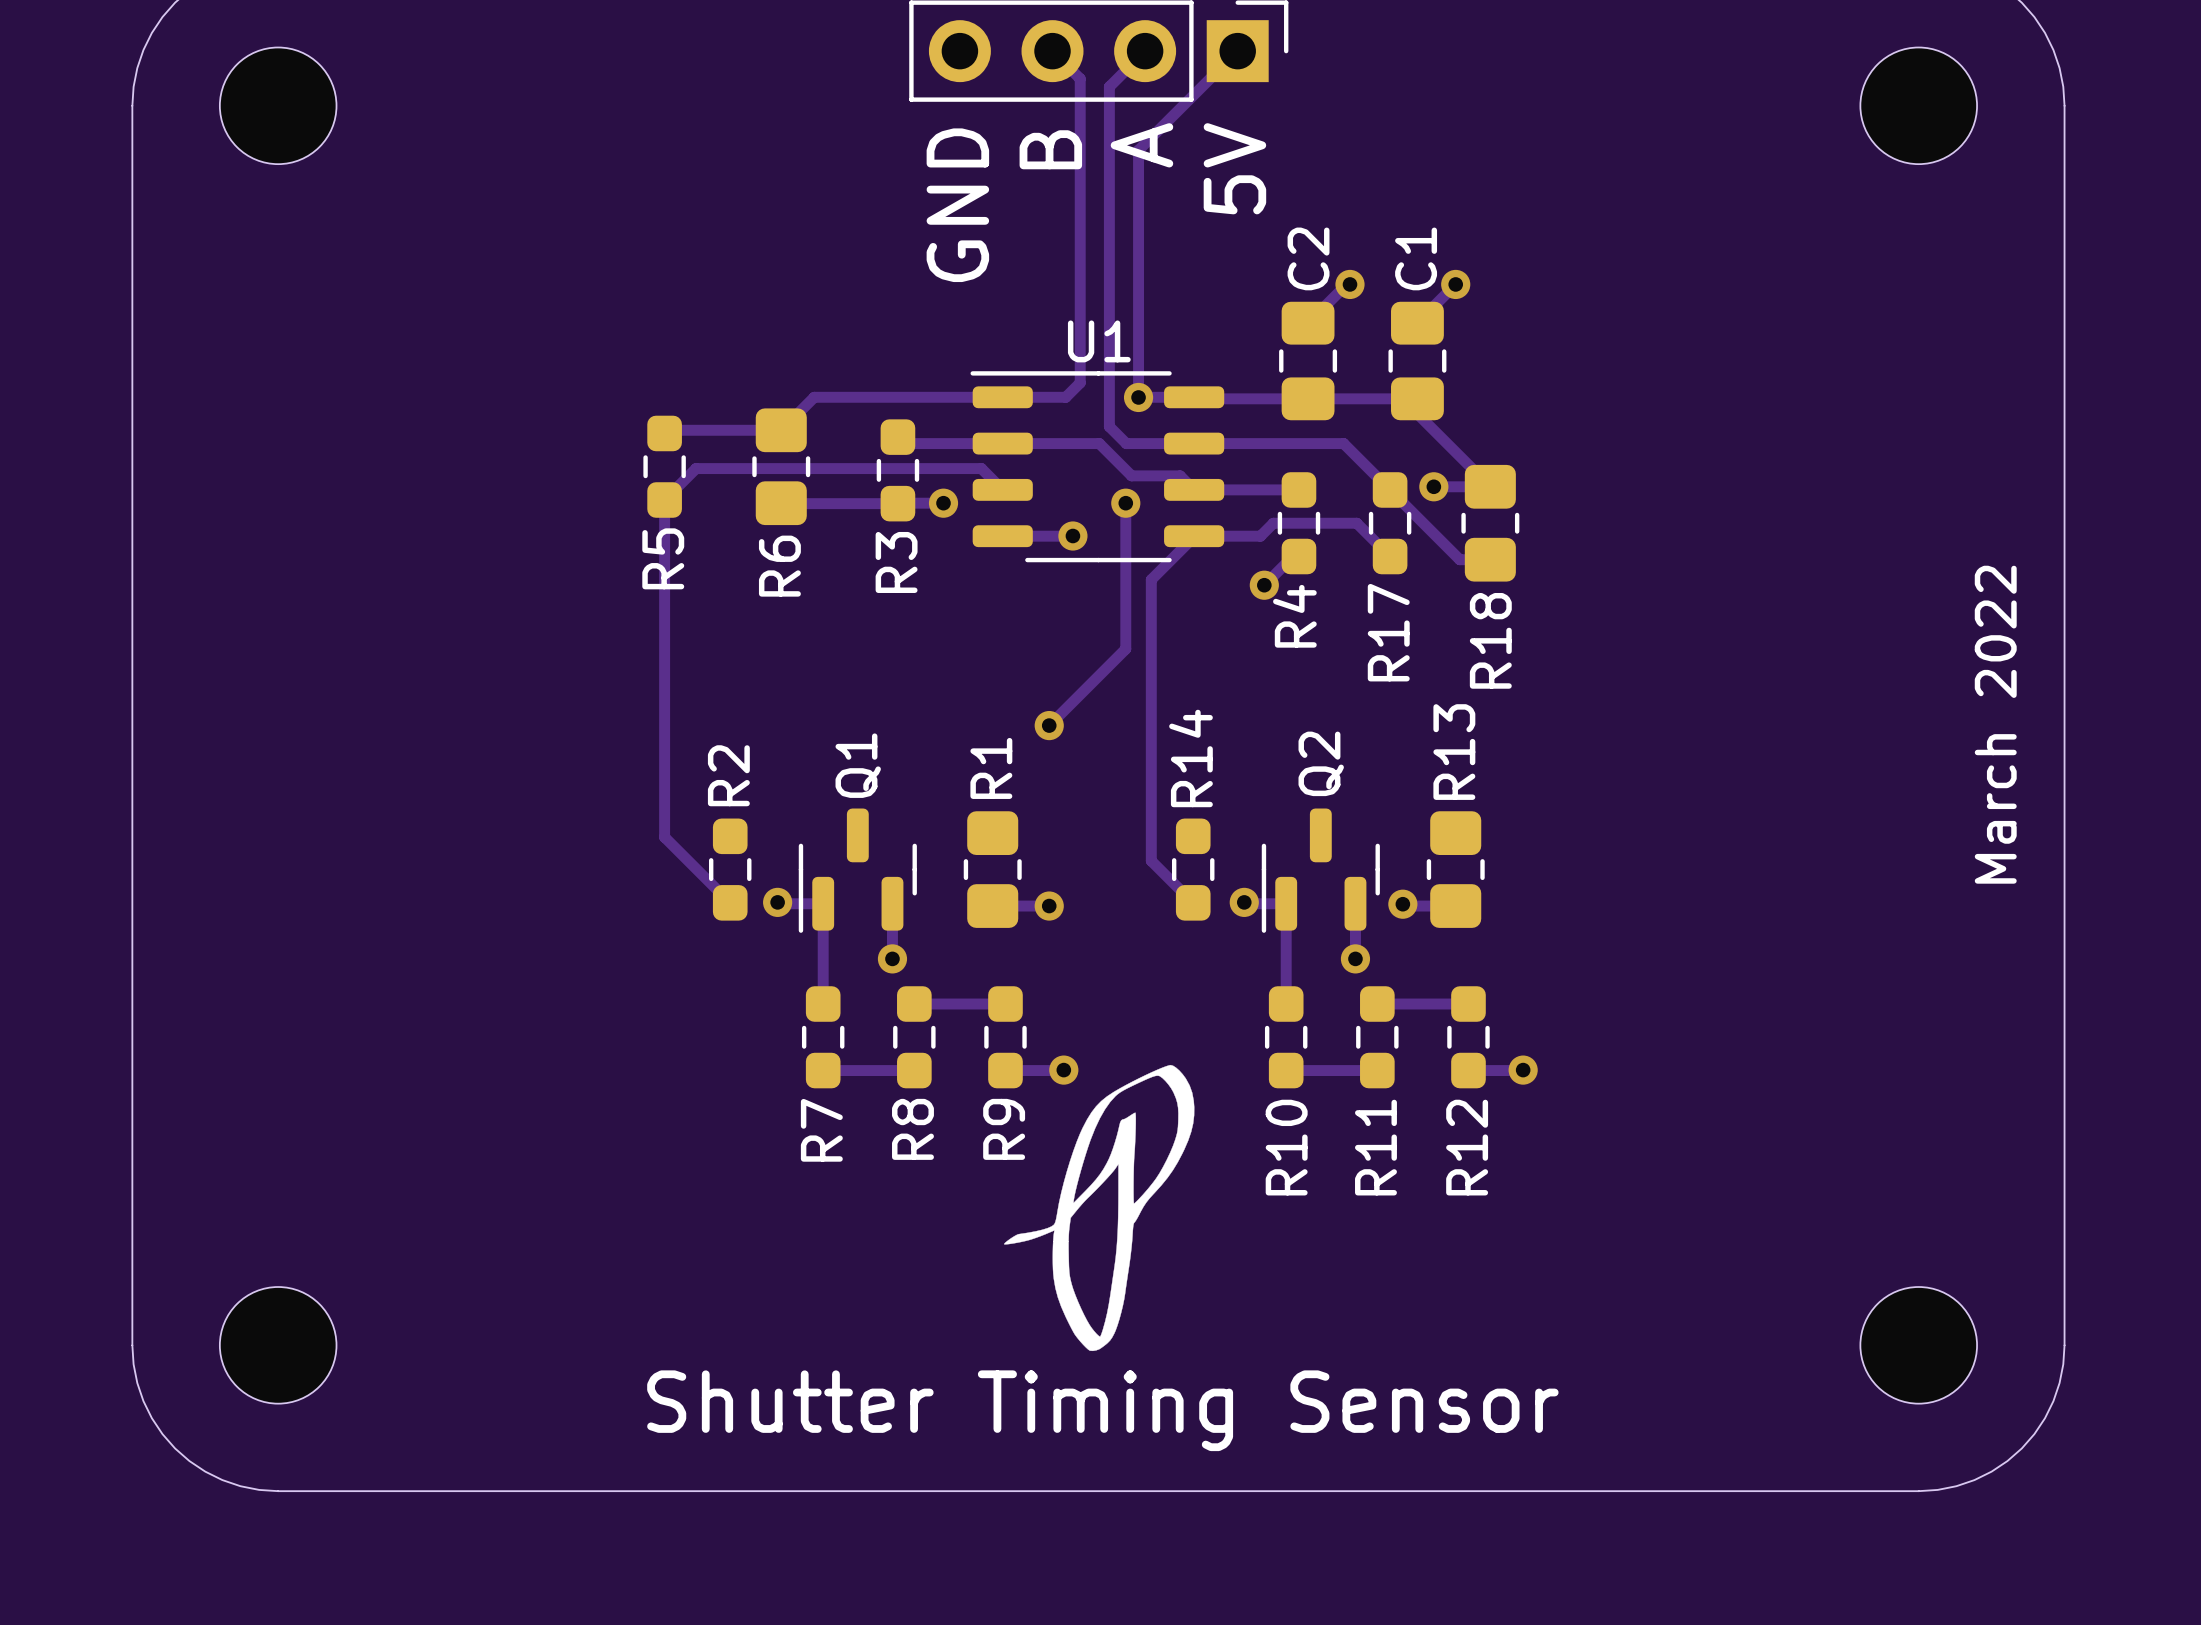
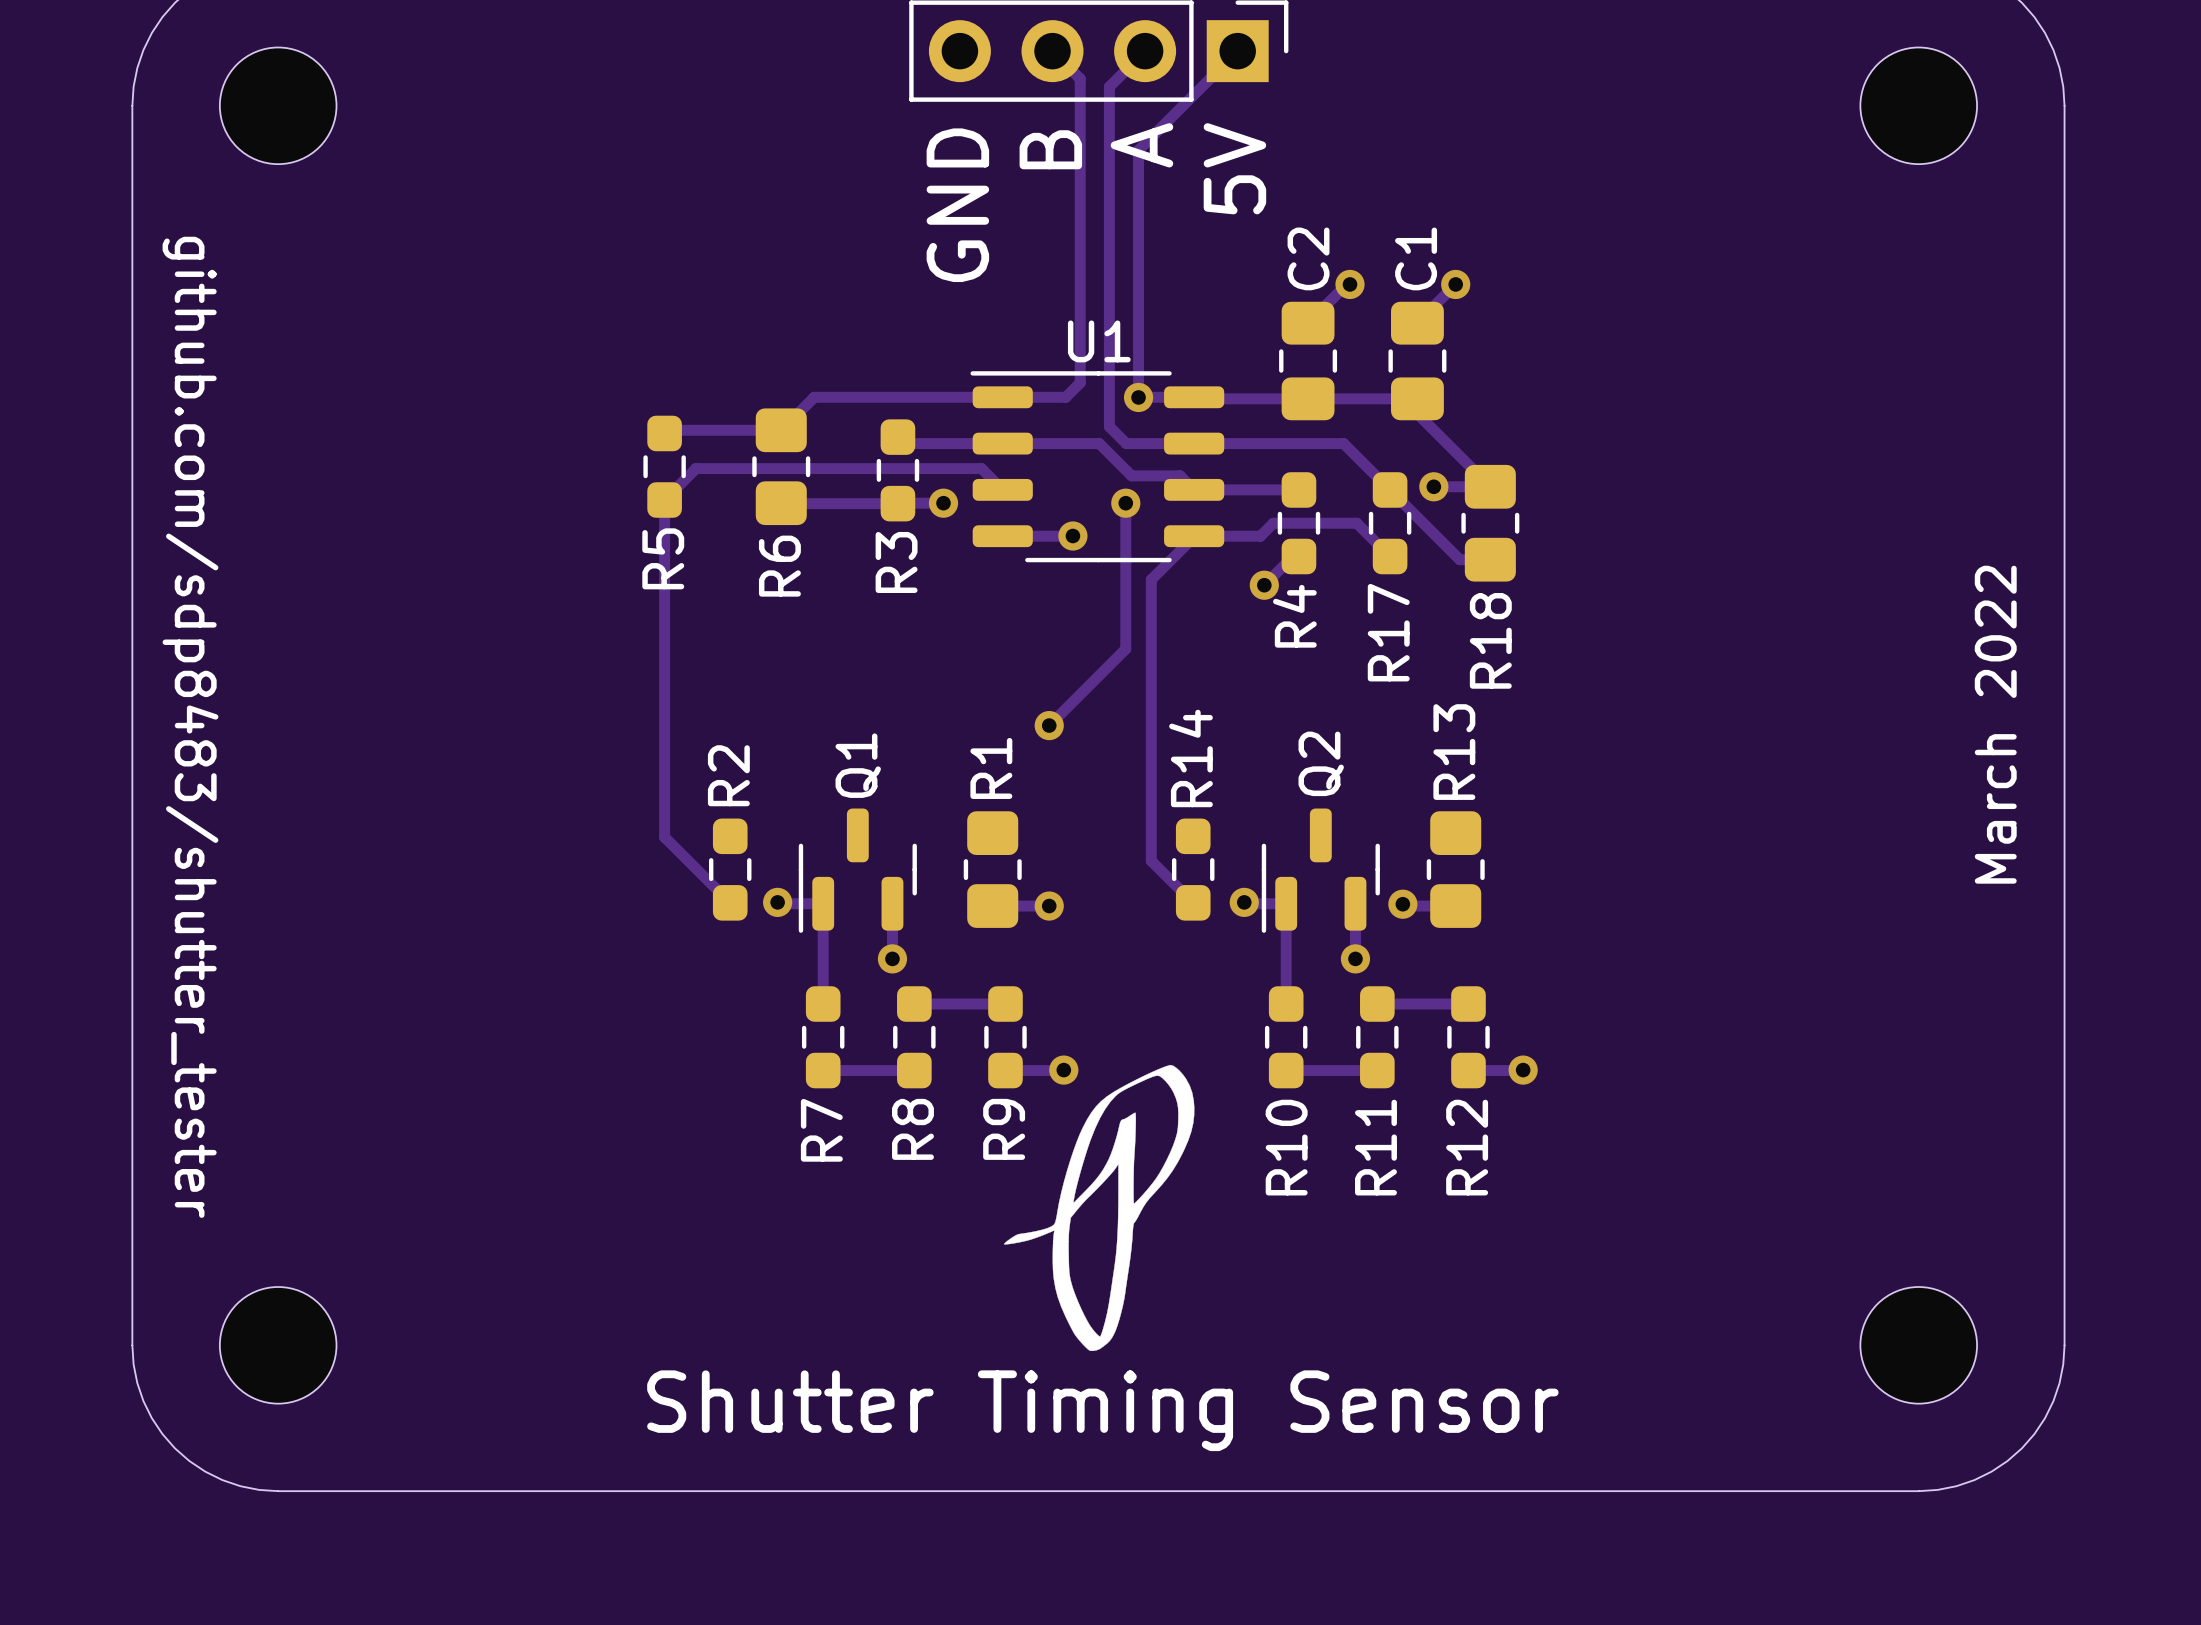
text: none -> github.com/sdp8483/shutter_tester (190, 727)

